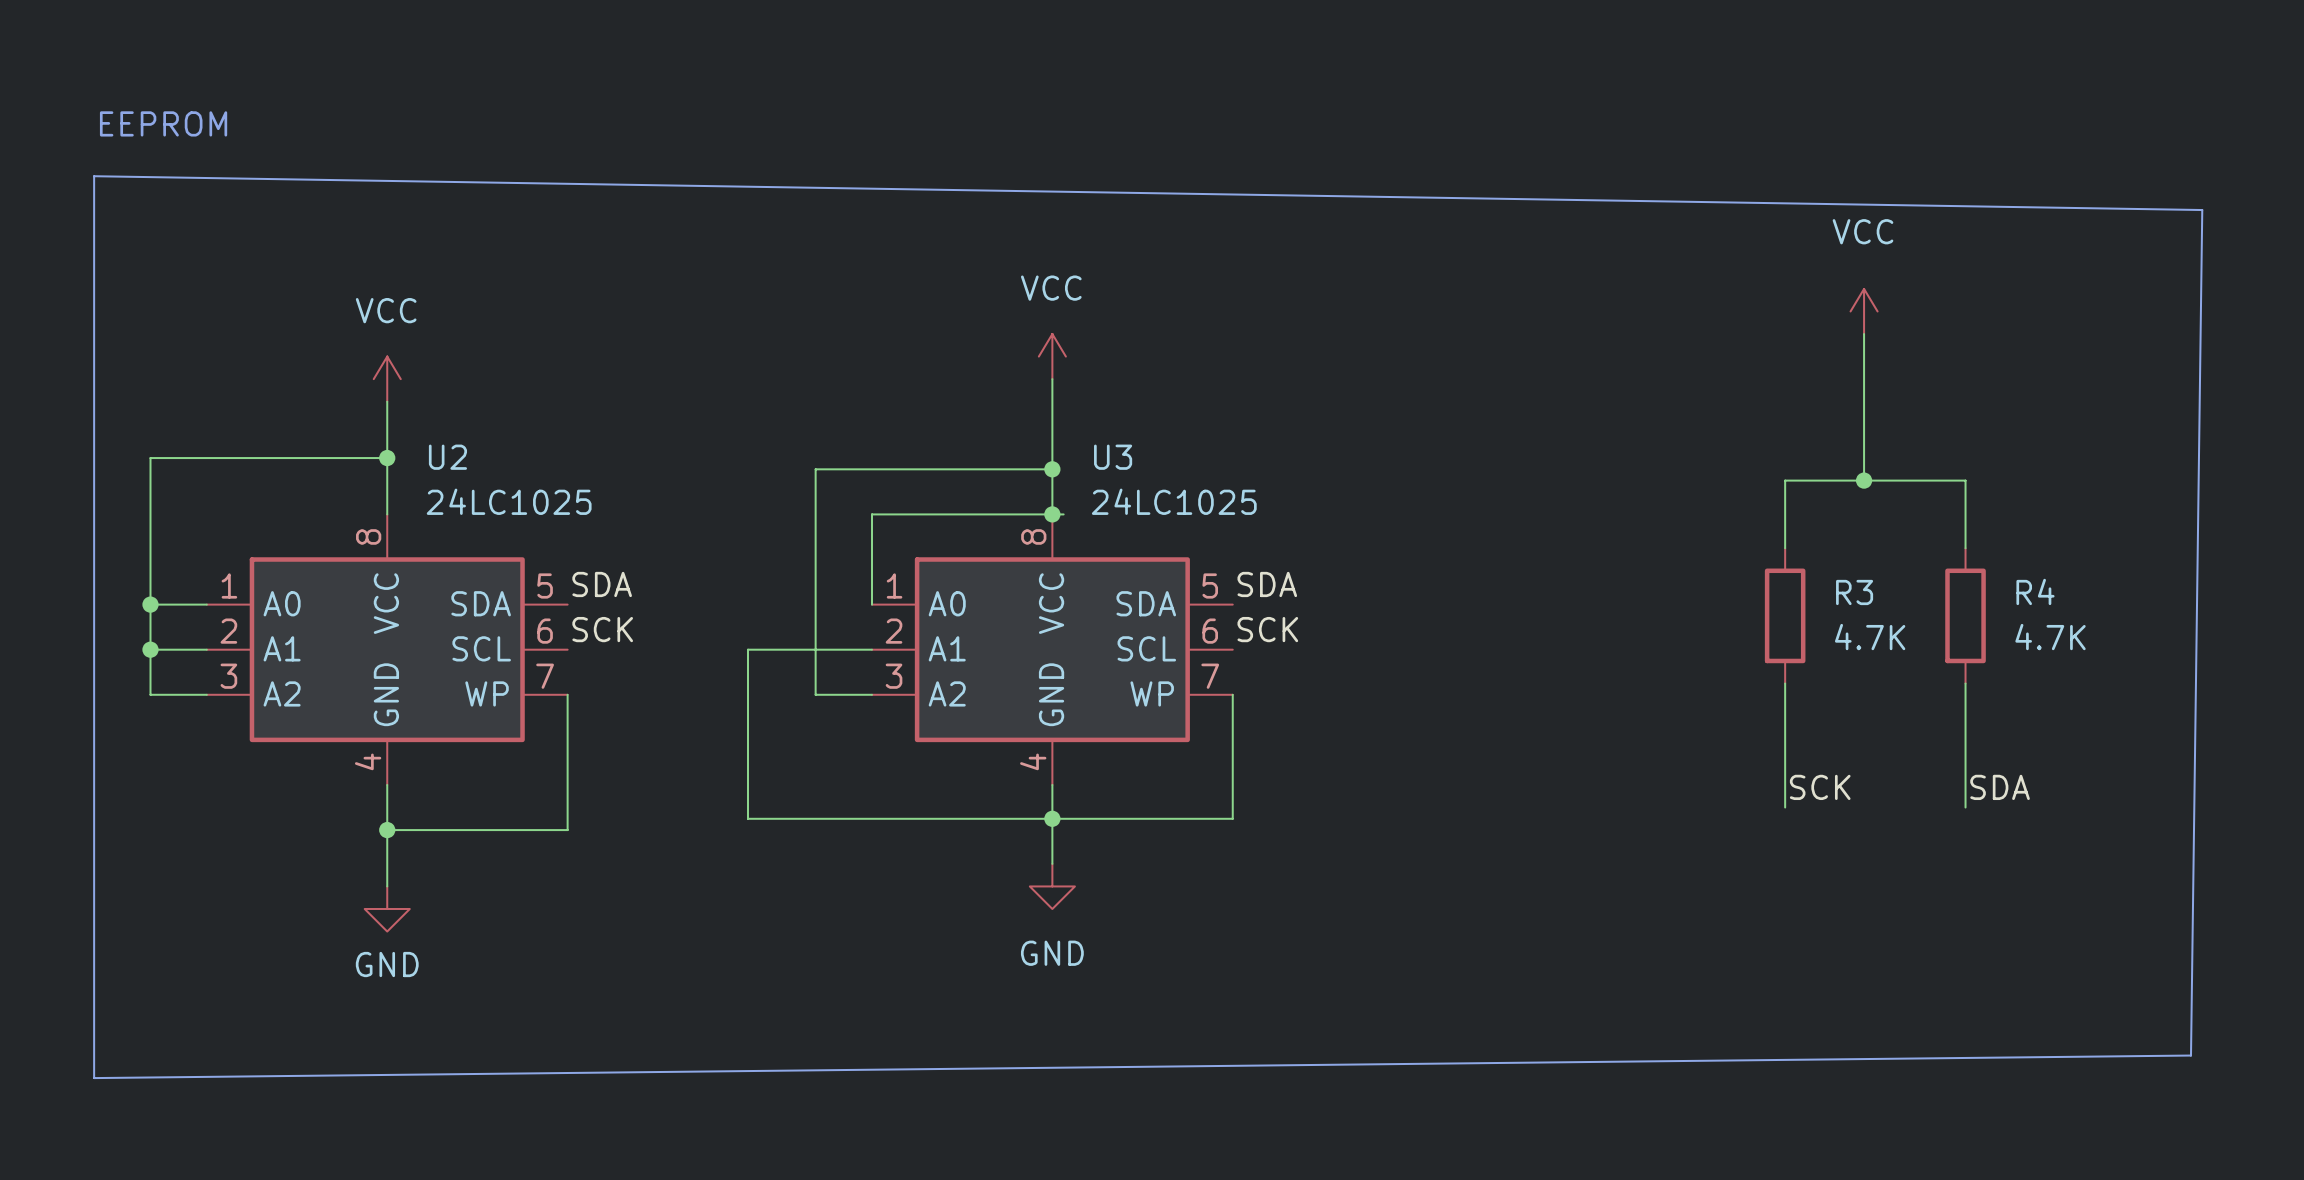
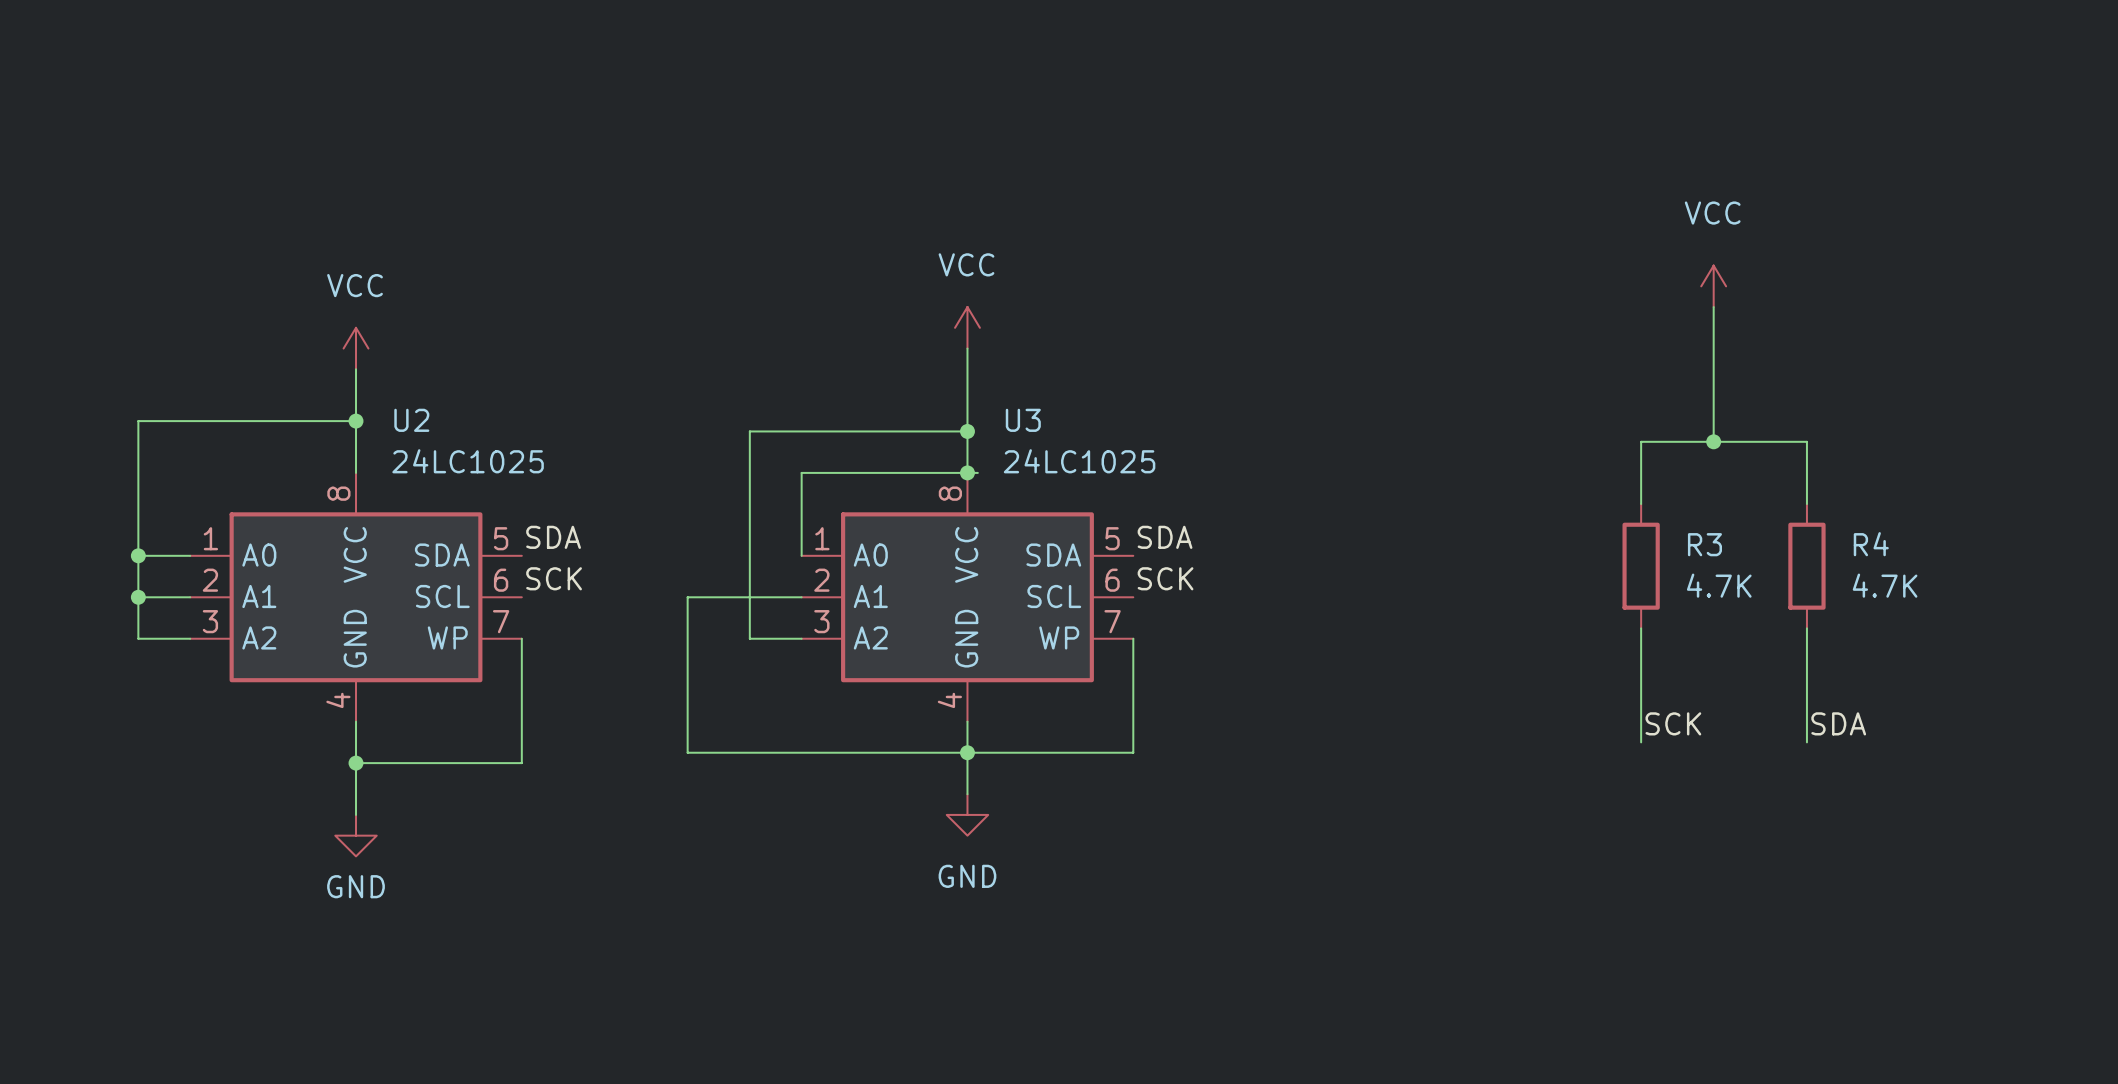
text: EEPROM (163, 123) -> none
line: (94, 176) (94, 1078) (2191, 1055) (2202, 210) (94, 176) -> none

